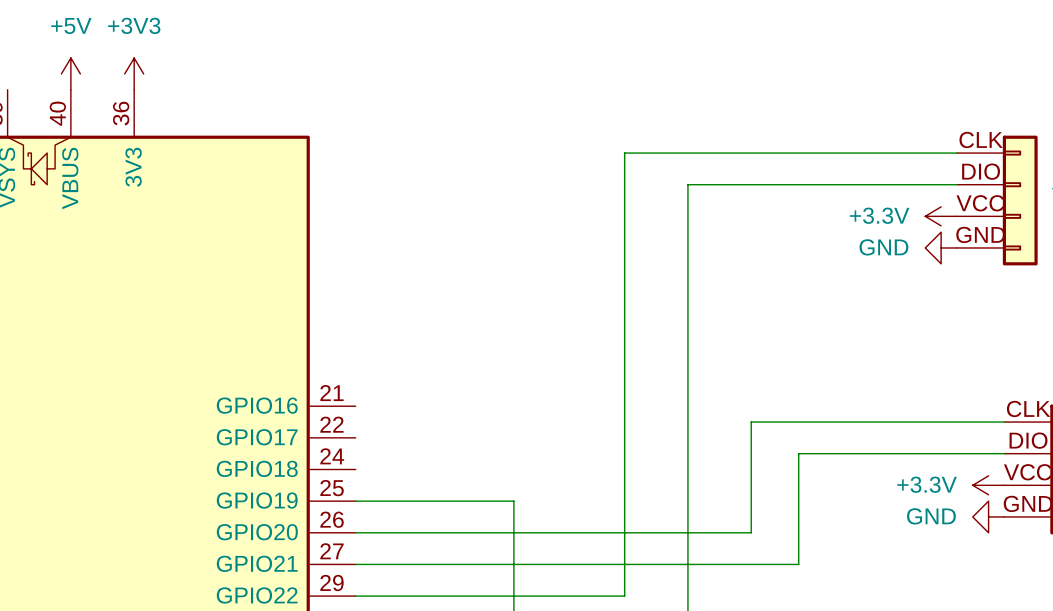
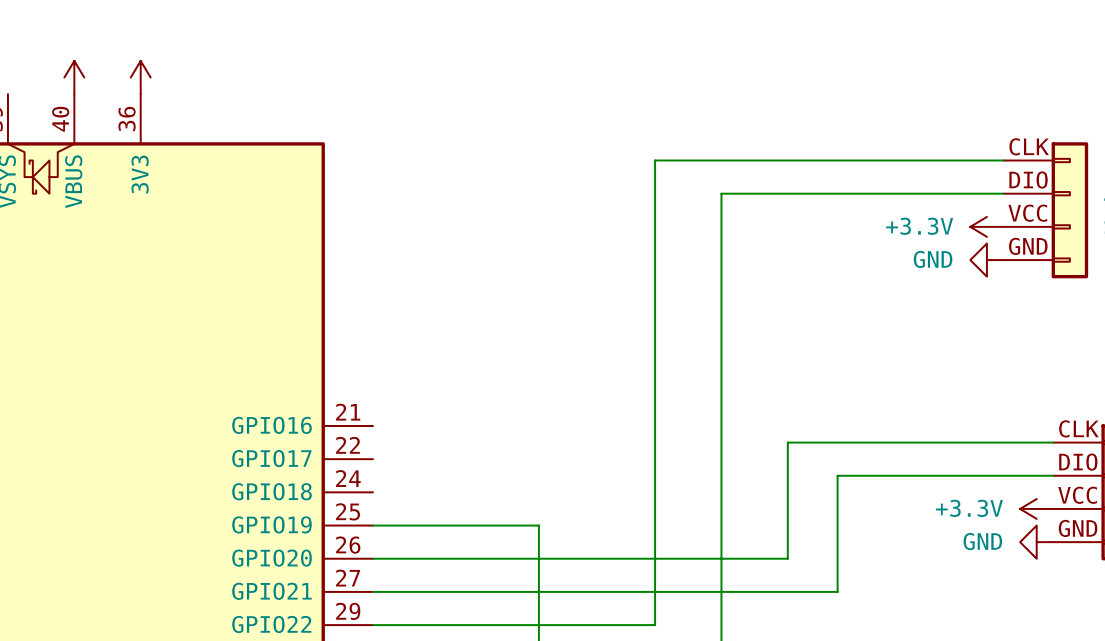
power symbol text: +3V3 (134, 25) -> none
power symbol text: +5V (71, 26) -> none

